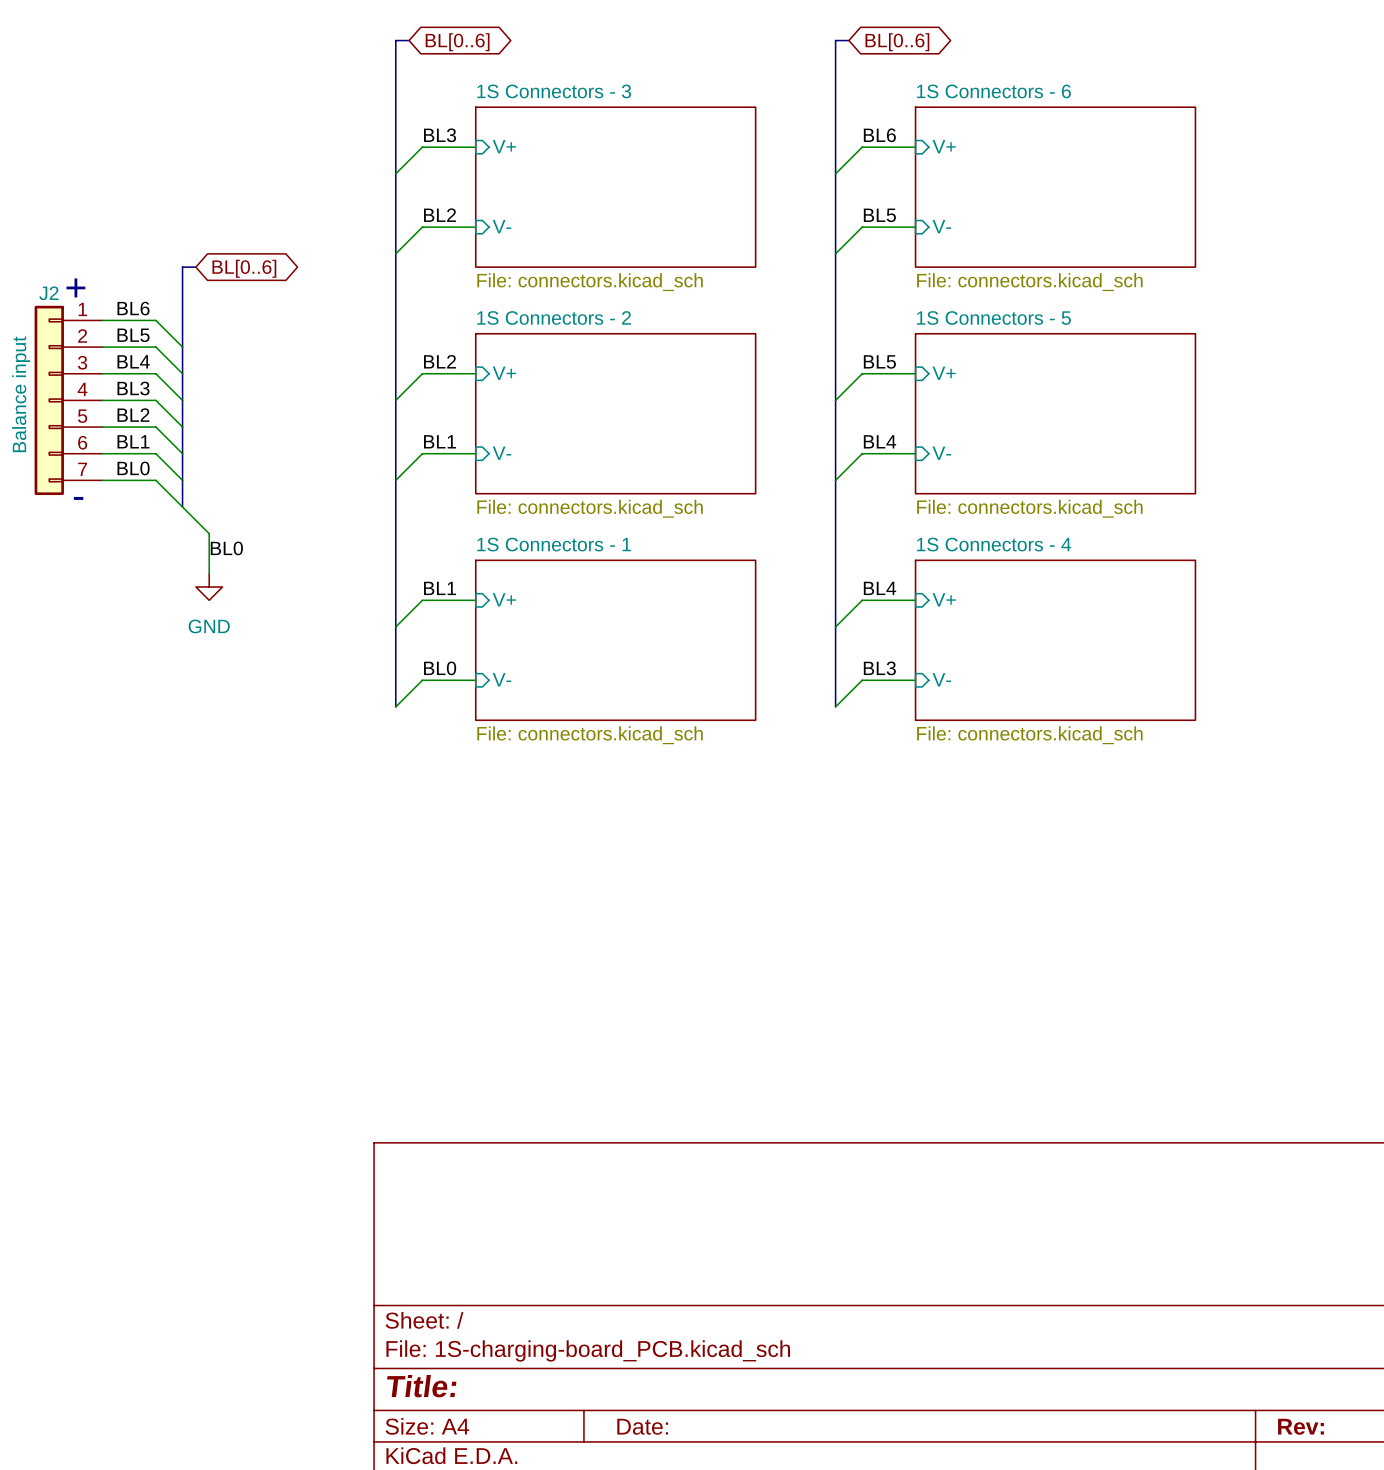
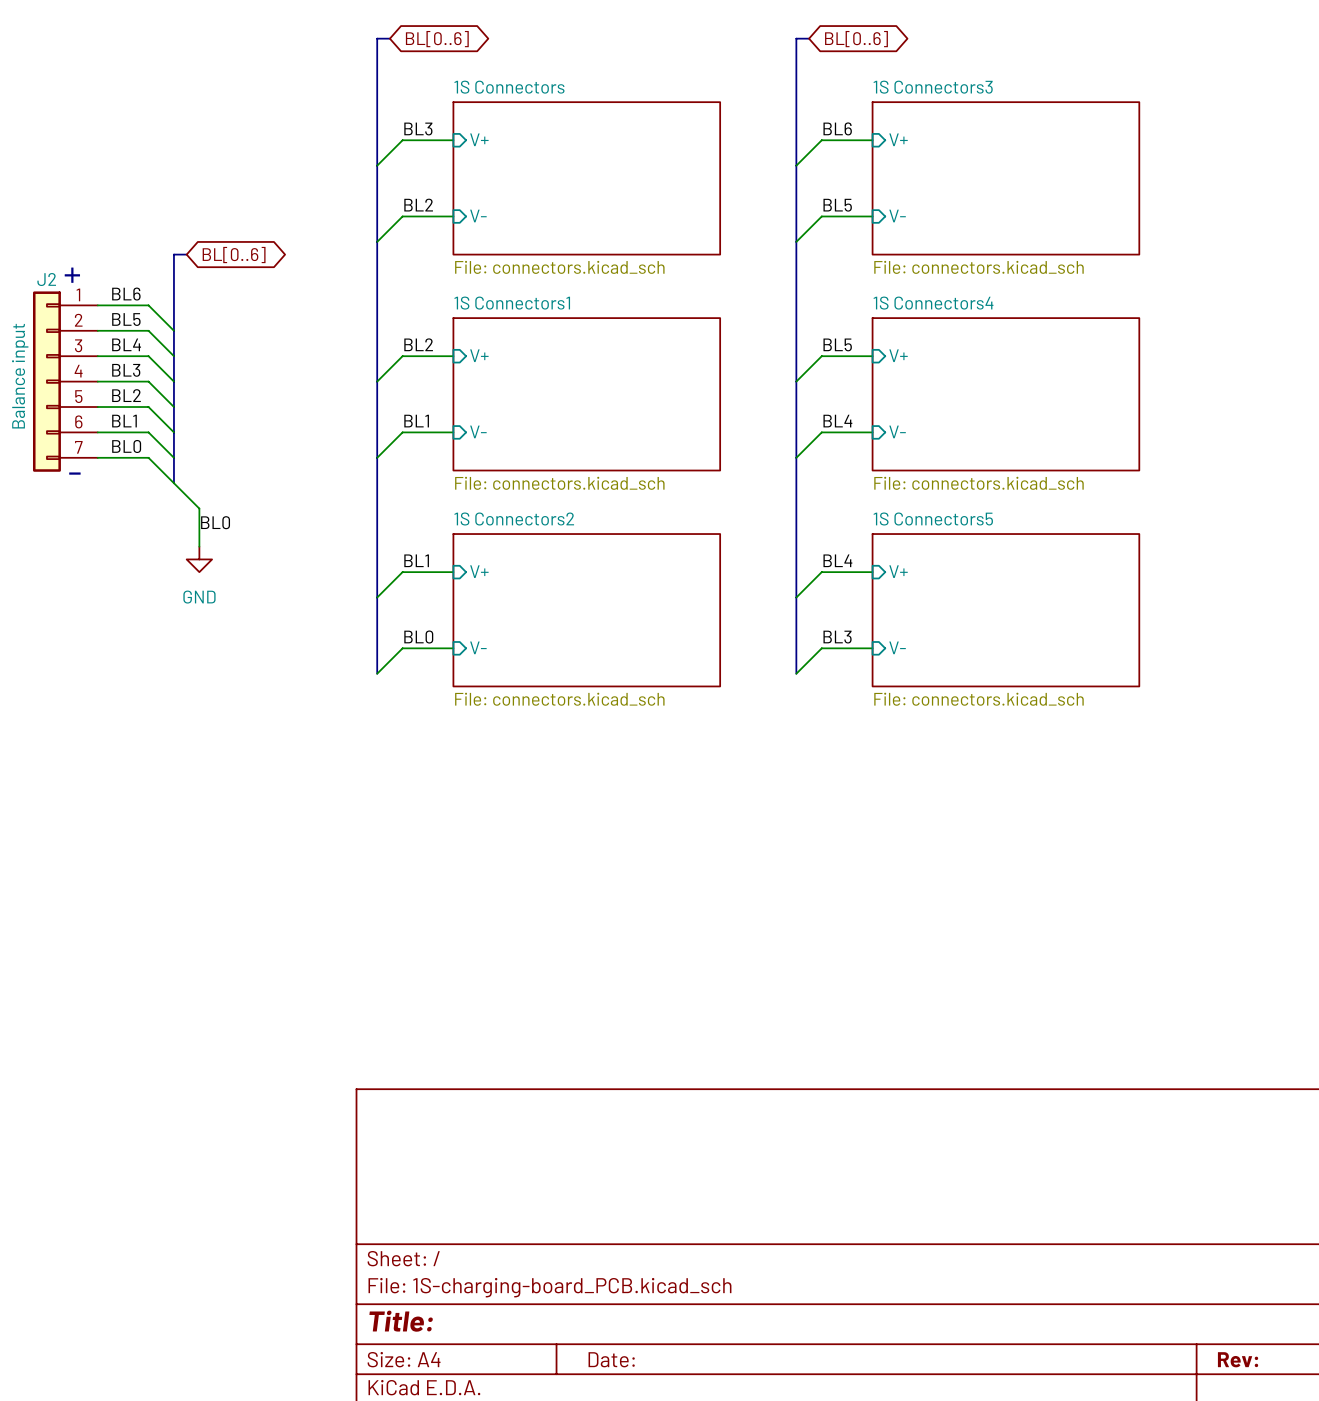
sheet 1S Connectors - 3 name: 1S Connectors - 3 (554, 91) -> 1S Connectors (509, 87)
sheet 1S Connectors - 6 name: 1S Connectors - 6 (993, 91) -> 1S Connectors3 (933, 87)
sheet 1S Connectors - 2 name: 1S Connectors - 2 (554, 318) -> 1S Connectors1 (512, 303)
sheet 1S Connectors - 5 name: 1S Connectors - 5 (993, 318) -> 1S Connectors4 (933, 303)
sheet 1S Connectors - 1 name: 1S Connectors - 1 (554, 544) -> 1S Connectors2 (514, 519)
sheet 1S Connectors - 4 name: 1S Connectors - 4 (994, 544) -> 1S Connectors5 (933, 519)

